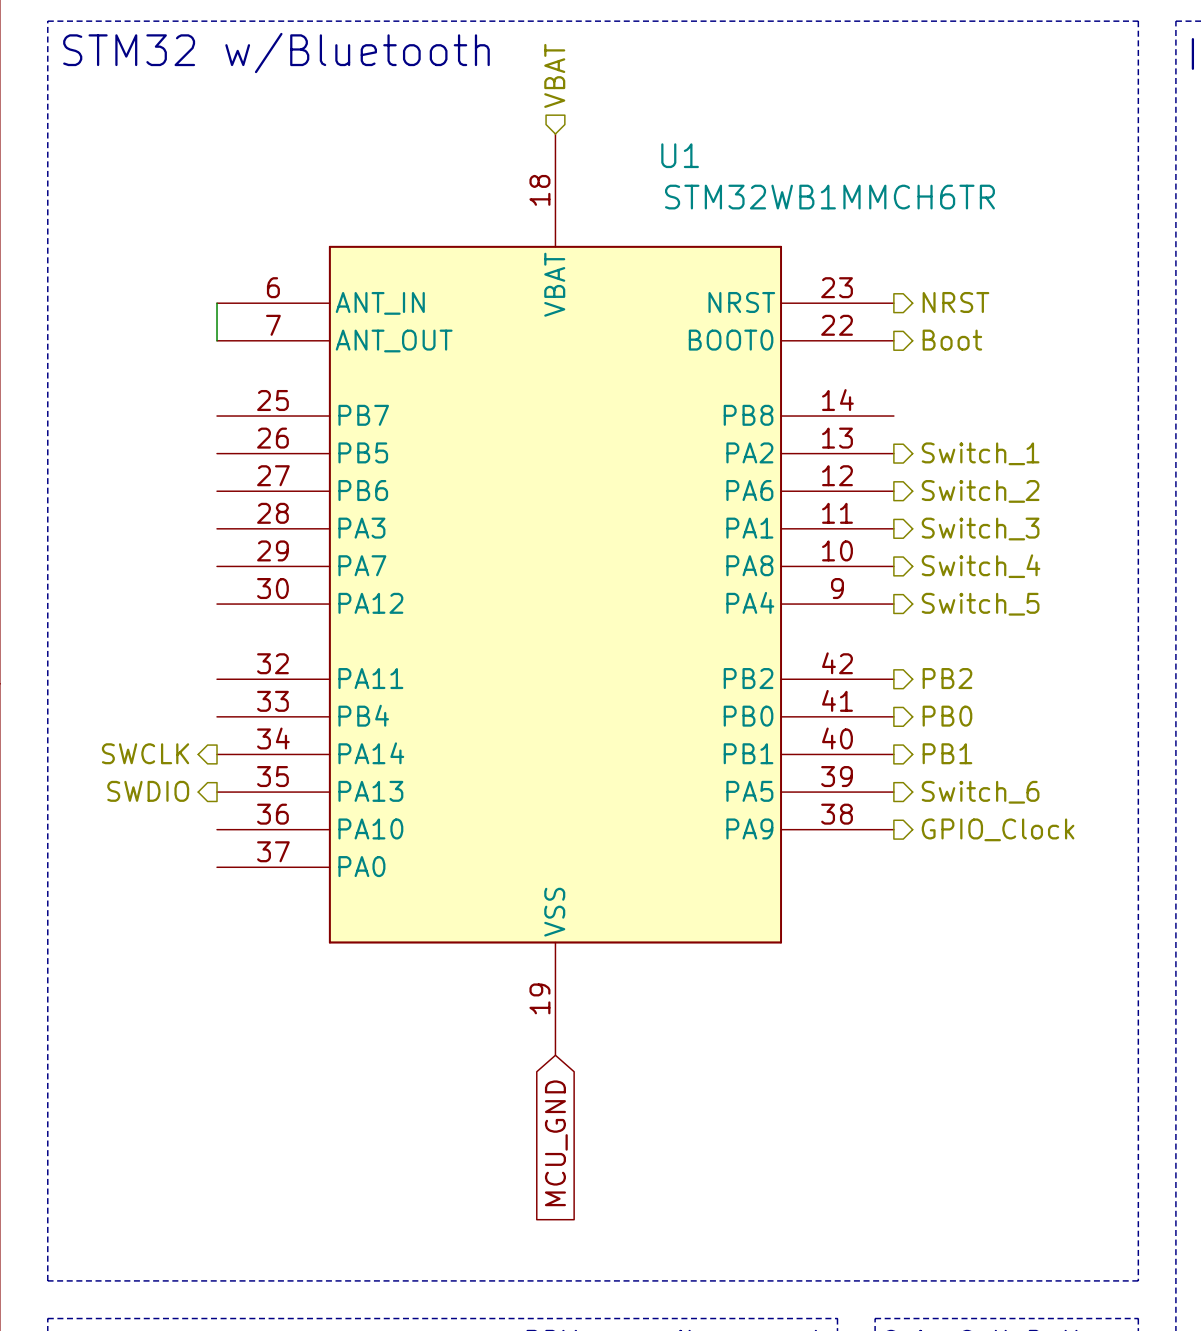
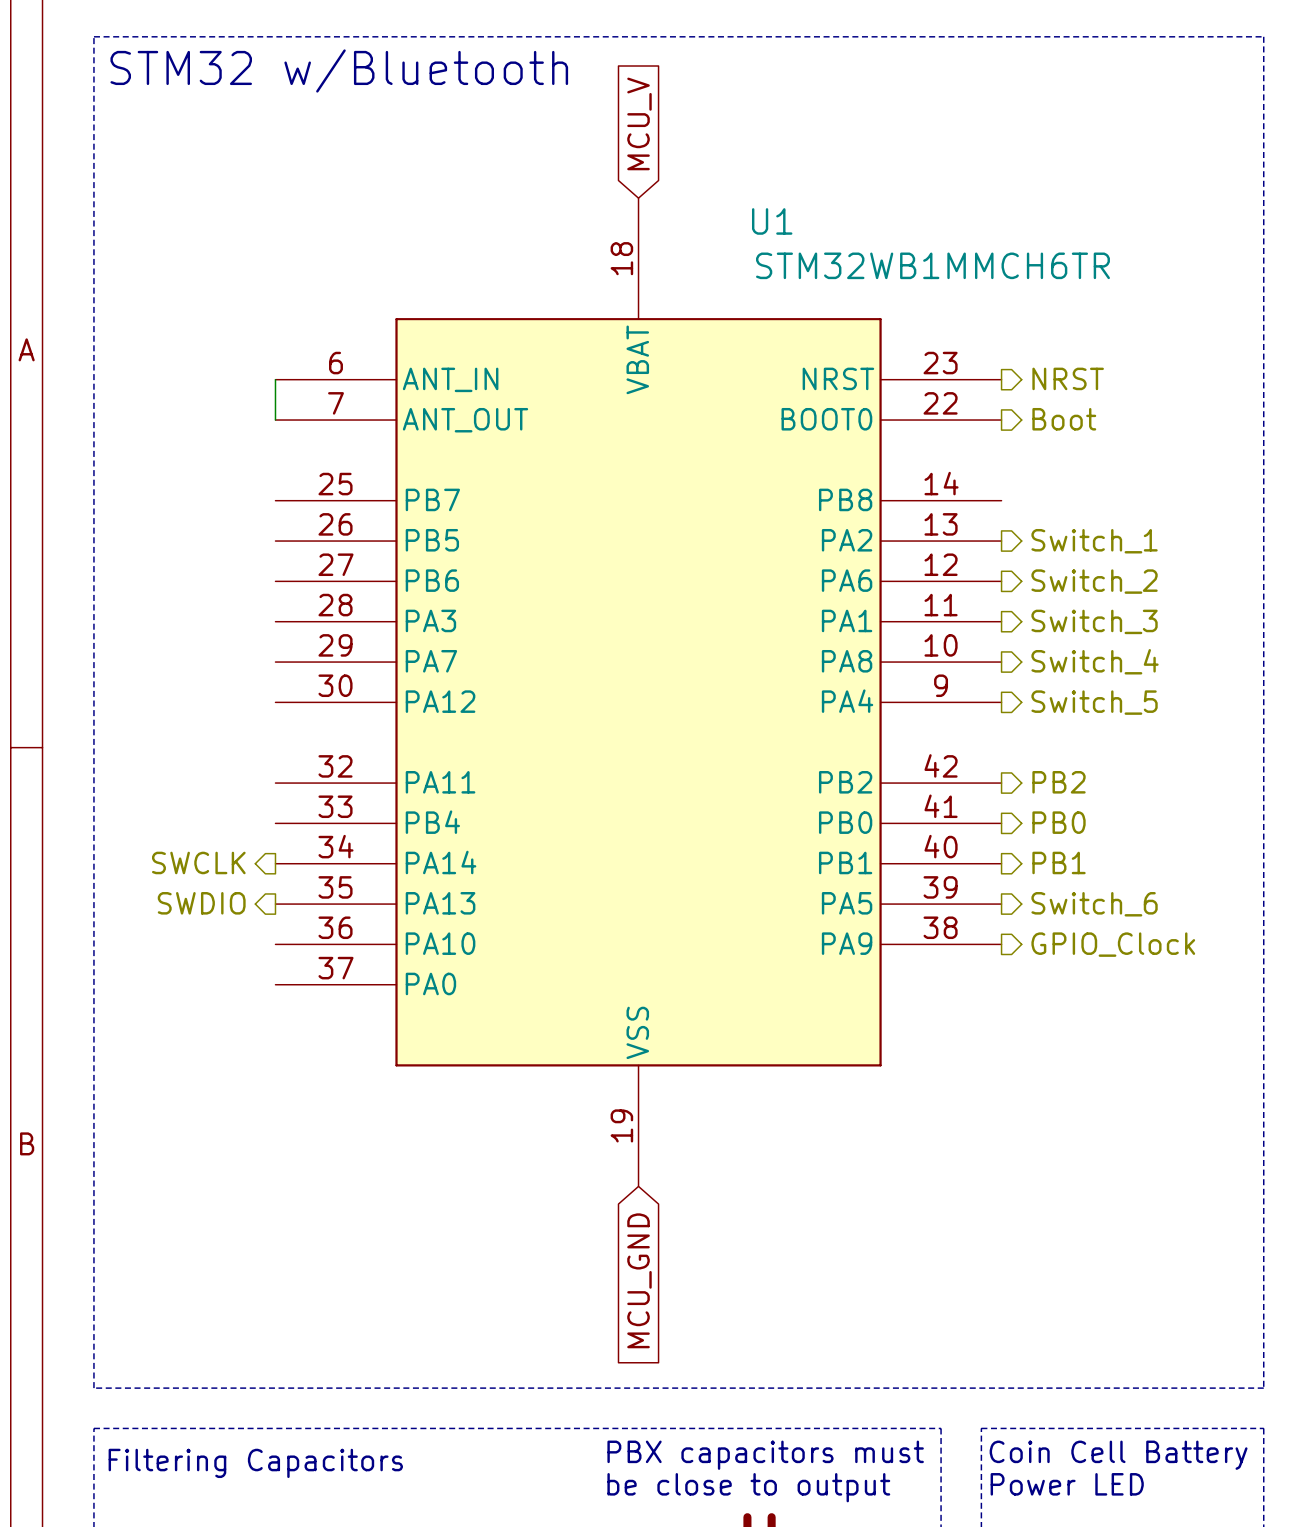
hierarchical label: VBAT (554, 75) -> none
global label: none -> MCU_V (639, 123)
hierarchical label: NRST (955, 302) -> none
wire: (217, 303) (217, 340) -> (275, 420) (275, 379)
hierarchical label: Boot (952, 340) -> NRST (1068, 378)
hierarchical label: none -> Boot (1064, 419)
hierarchical label: Switch_1 (980, 453) -> none
hierarchical label: Switch_2 (980, 491) -> Switch_1 (1094, 541)
hierarchical label: Switch_3 (980, 529) -> Switch_2 (1094, 581)
hierarchical label: Switch_4 (981, 566) -> Switch_3 (1094, 621)
U1 position: (555, 594) -> (638, 692)
hierarchical label: Switch_5 (980, 604) -> Switch_4 (1095, 661)
hierarchical label: none -> Switch_5 (1094, 702)
hierarchical label: PB2 (947, 678) -> none
hierarchical label: PB0 (947, 716) -> PB2 (1059, 782)
hierarchical label: SWCLK (145, 753) -> none
hierarchical label: PB1 (947, 753) -> PB0 (1059, 822)
hierarchical label: SWDIO (148, 791) -> SWCLK (198, 862)
hierarchical label: Switch_6 (980, 792) -> PB1 (1059, 862)
hierarchical label: none -> SWDIO (201, 903)
hierarchical label: GPIO_Clock (998, 829) -> Switch_6 (1094, 904)
hierarchical label: none -> GPIO_Clock (1113, 944)
global label position: MCU_GND (556, 1143) -> MCU_GND (639, 1280)

